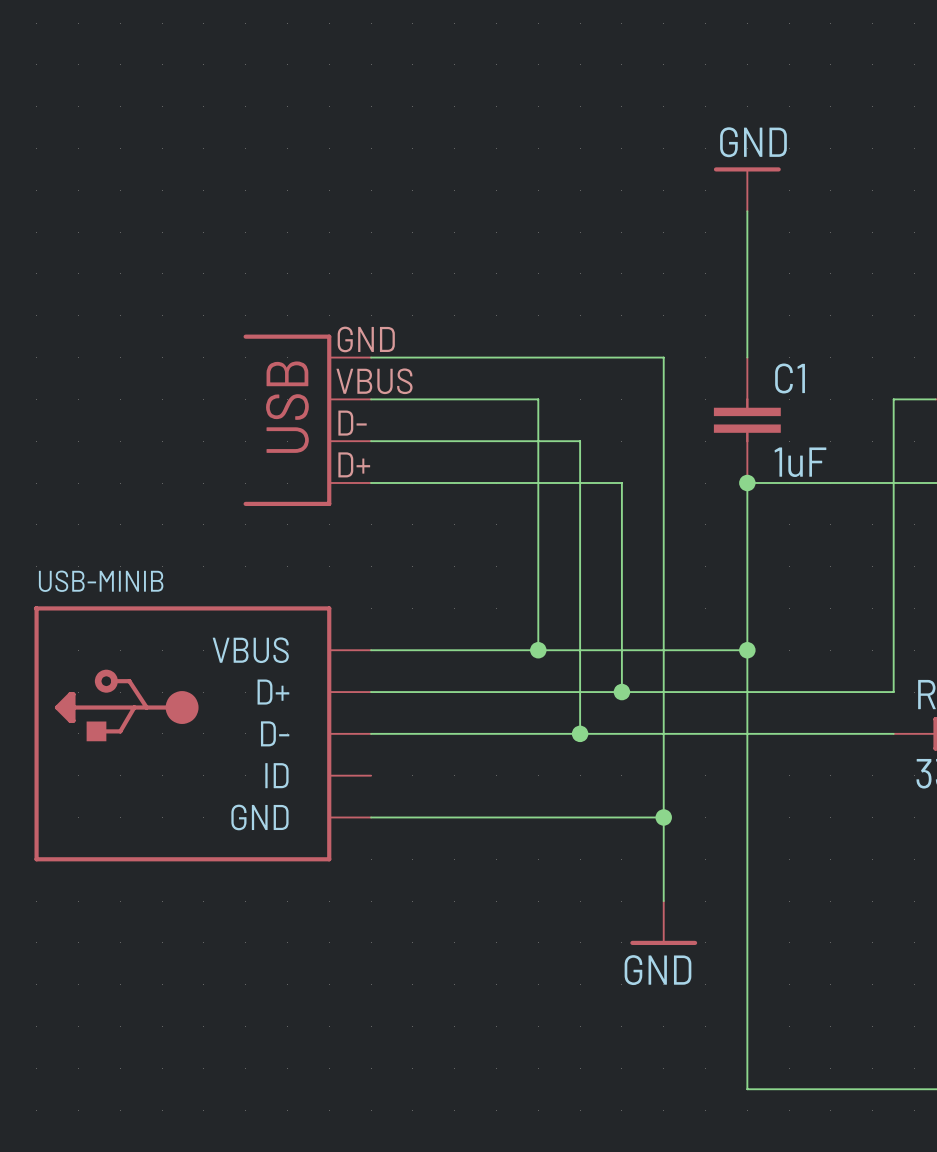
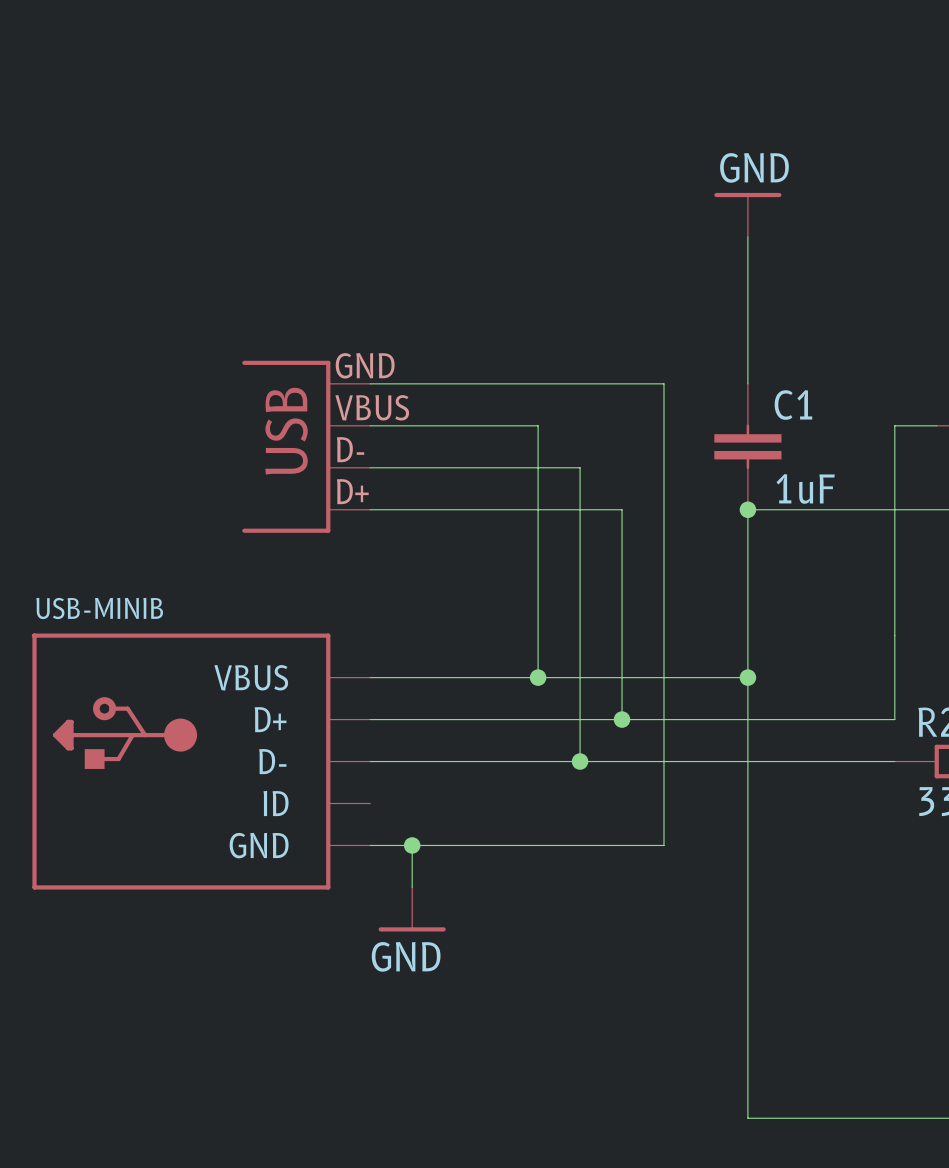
wire: none -> (412, 845) (412, 887)
junction: none -> (412, 845)
wire: (663, 817) (663, 901) -> none
junction: (663, 817) -> none
power symbol position: GND (663, 923) -> GND (412, 909)

